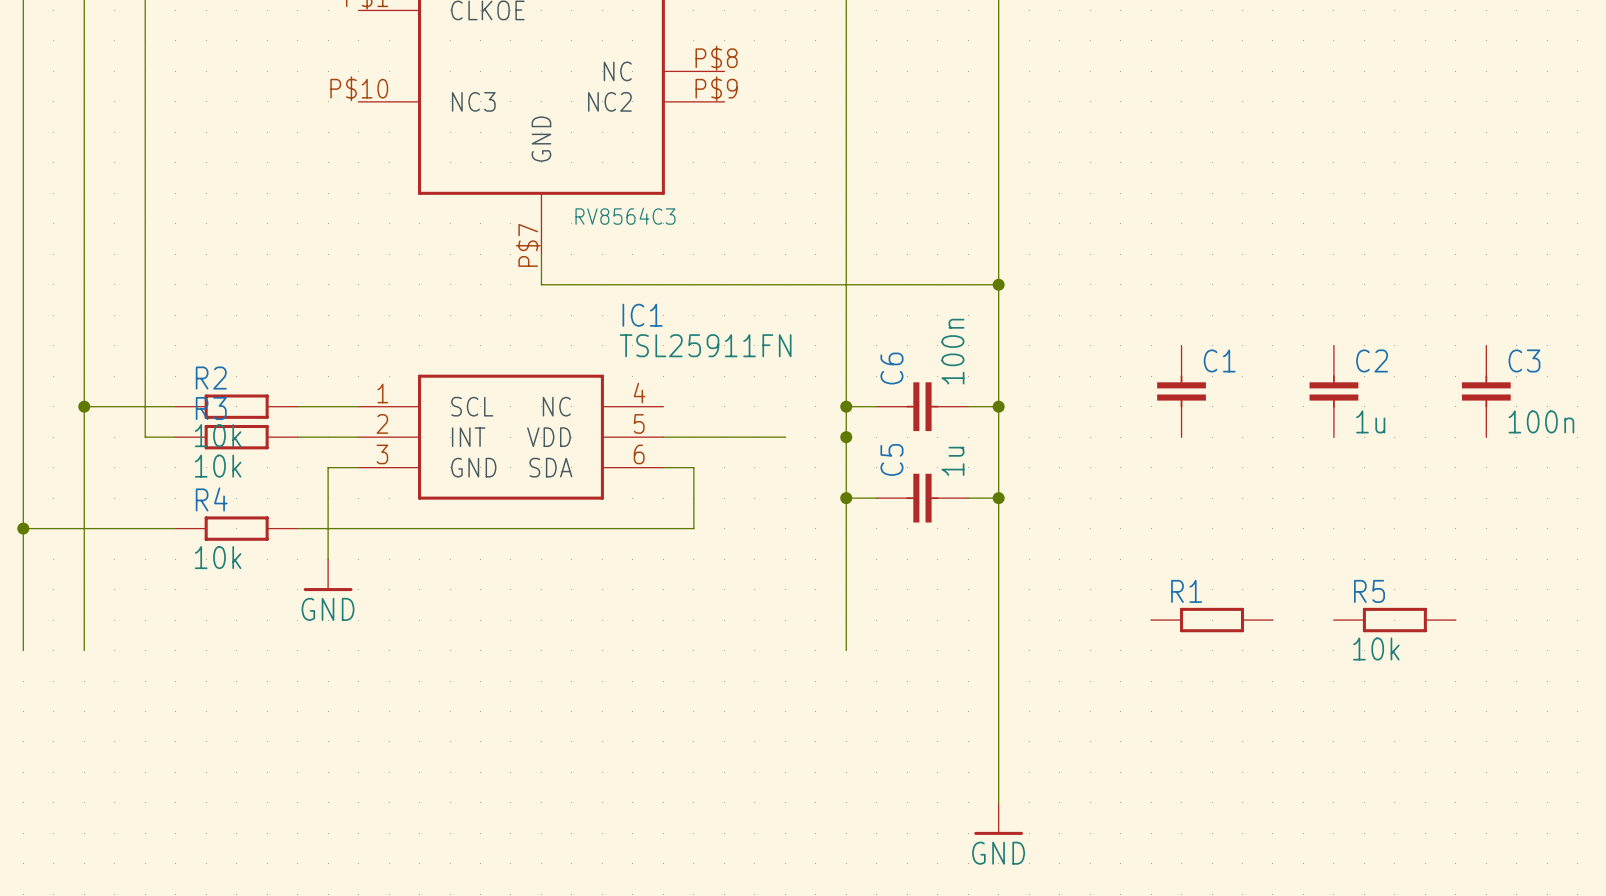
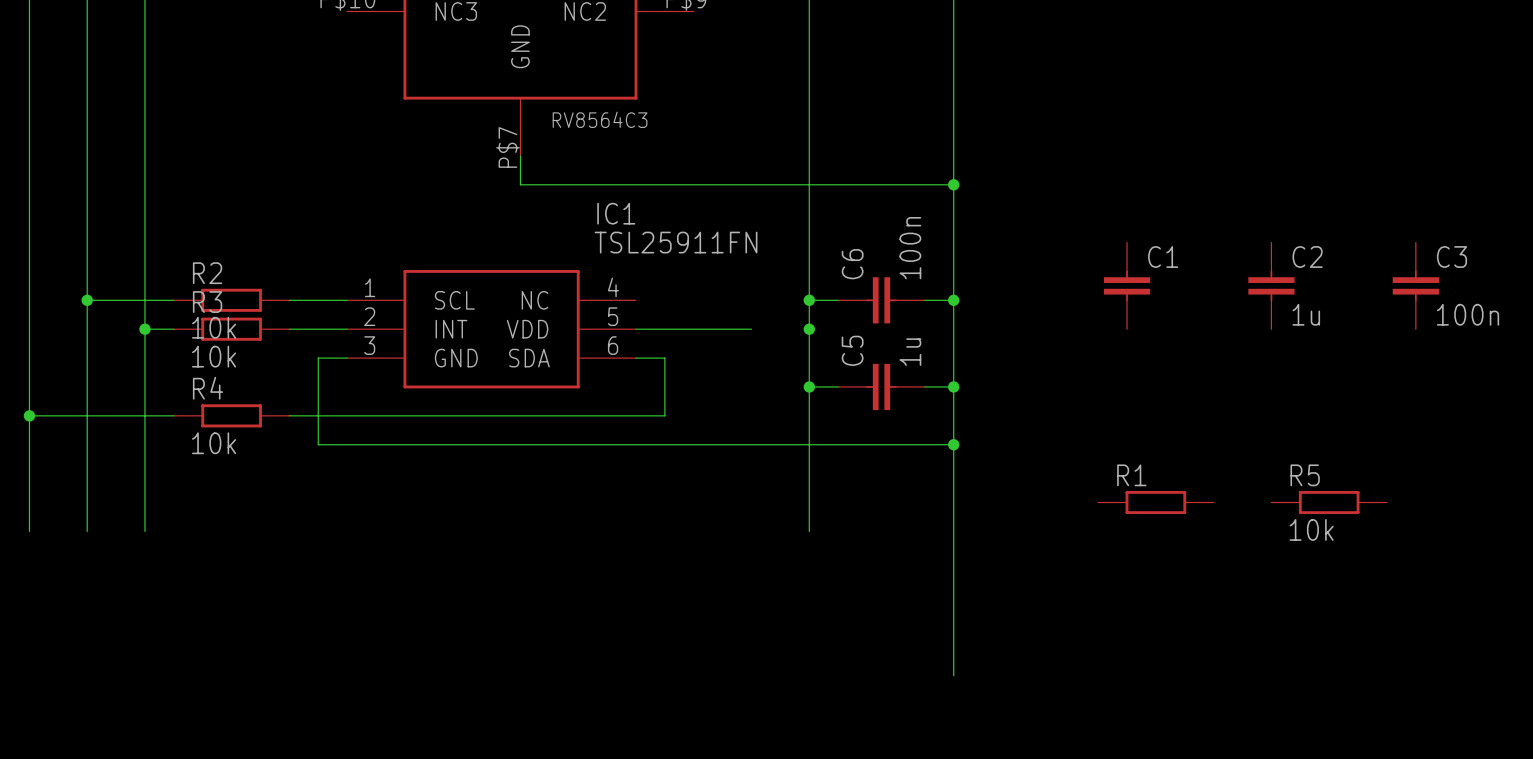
wire: none -> (144, 329) (144, 531)
junction: none -> (144, 329)
wire: none -> (318, 444) (953, 444)
junction: none -> (953, 444)
power symbol: GND (328, 575) -> none
power symbol: GND (998, 818) -> none

